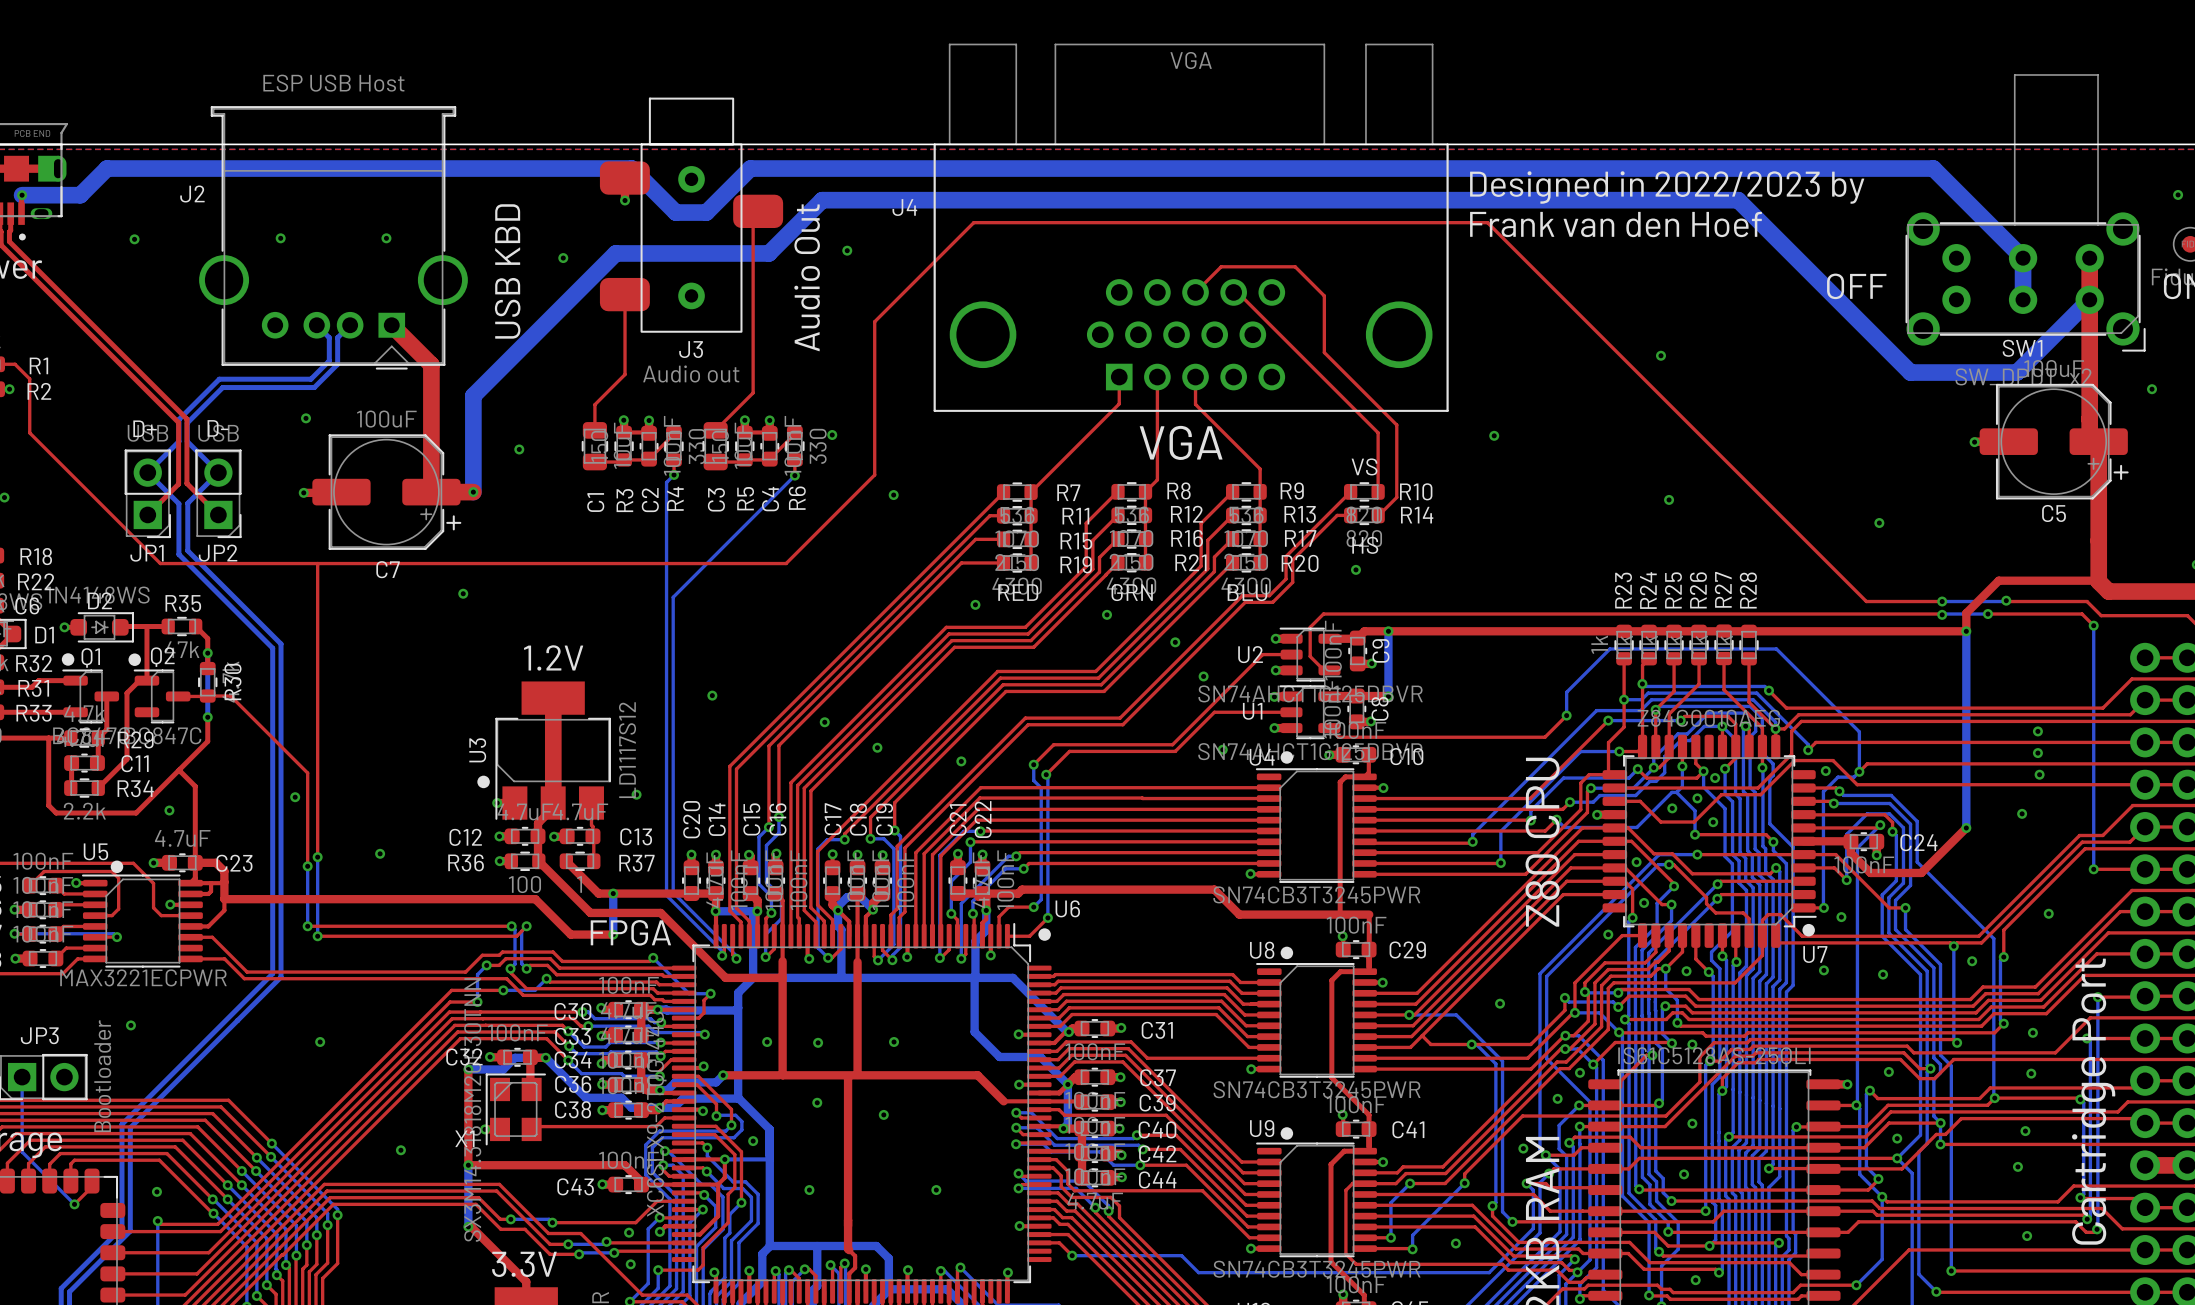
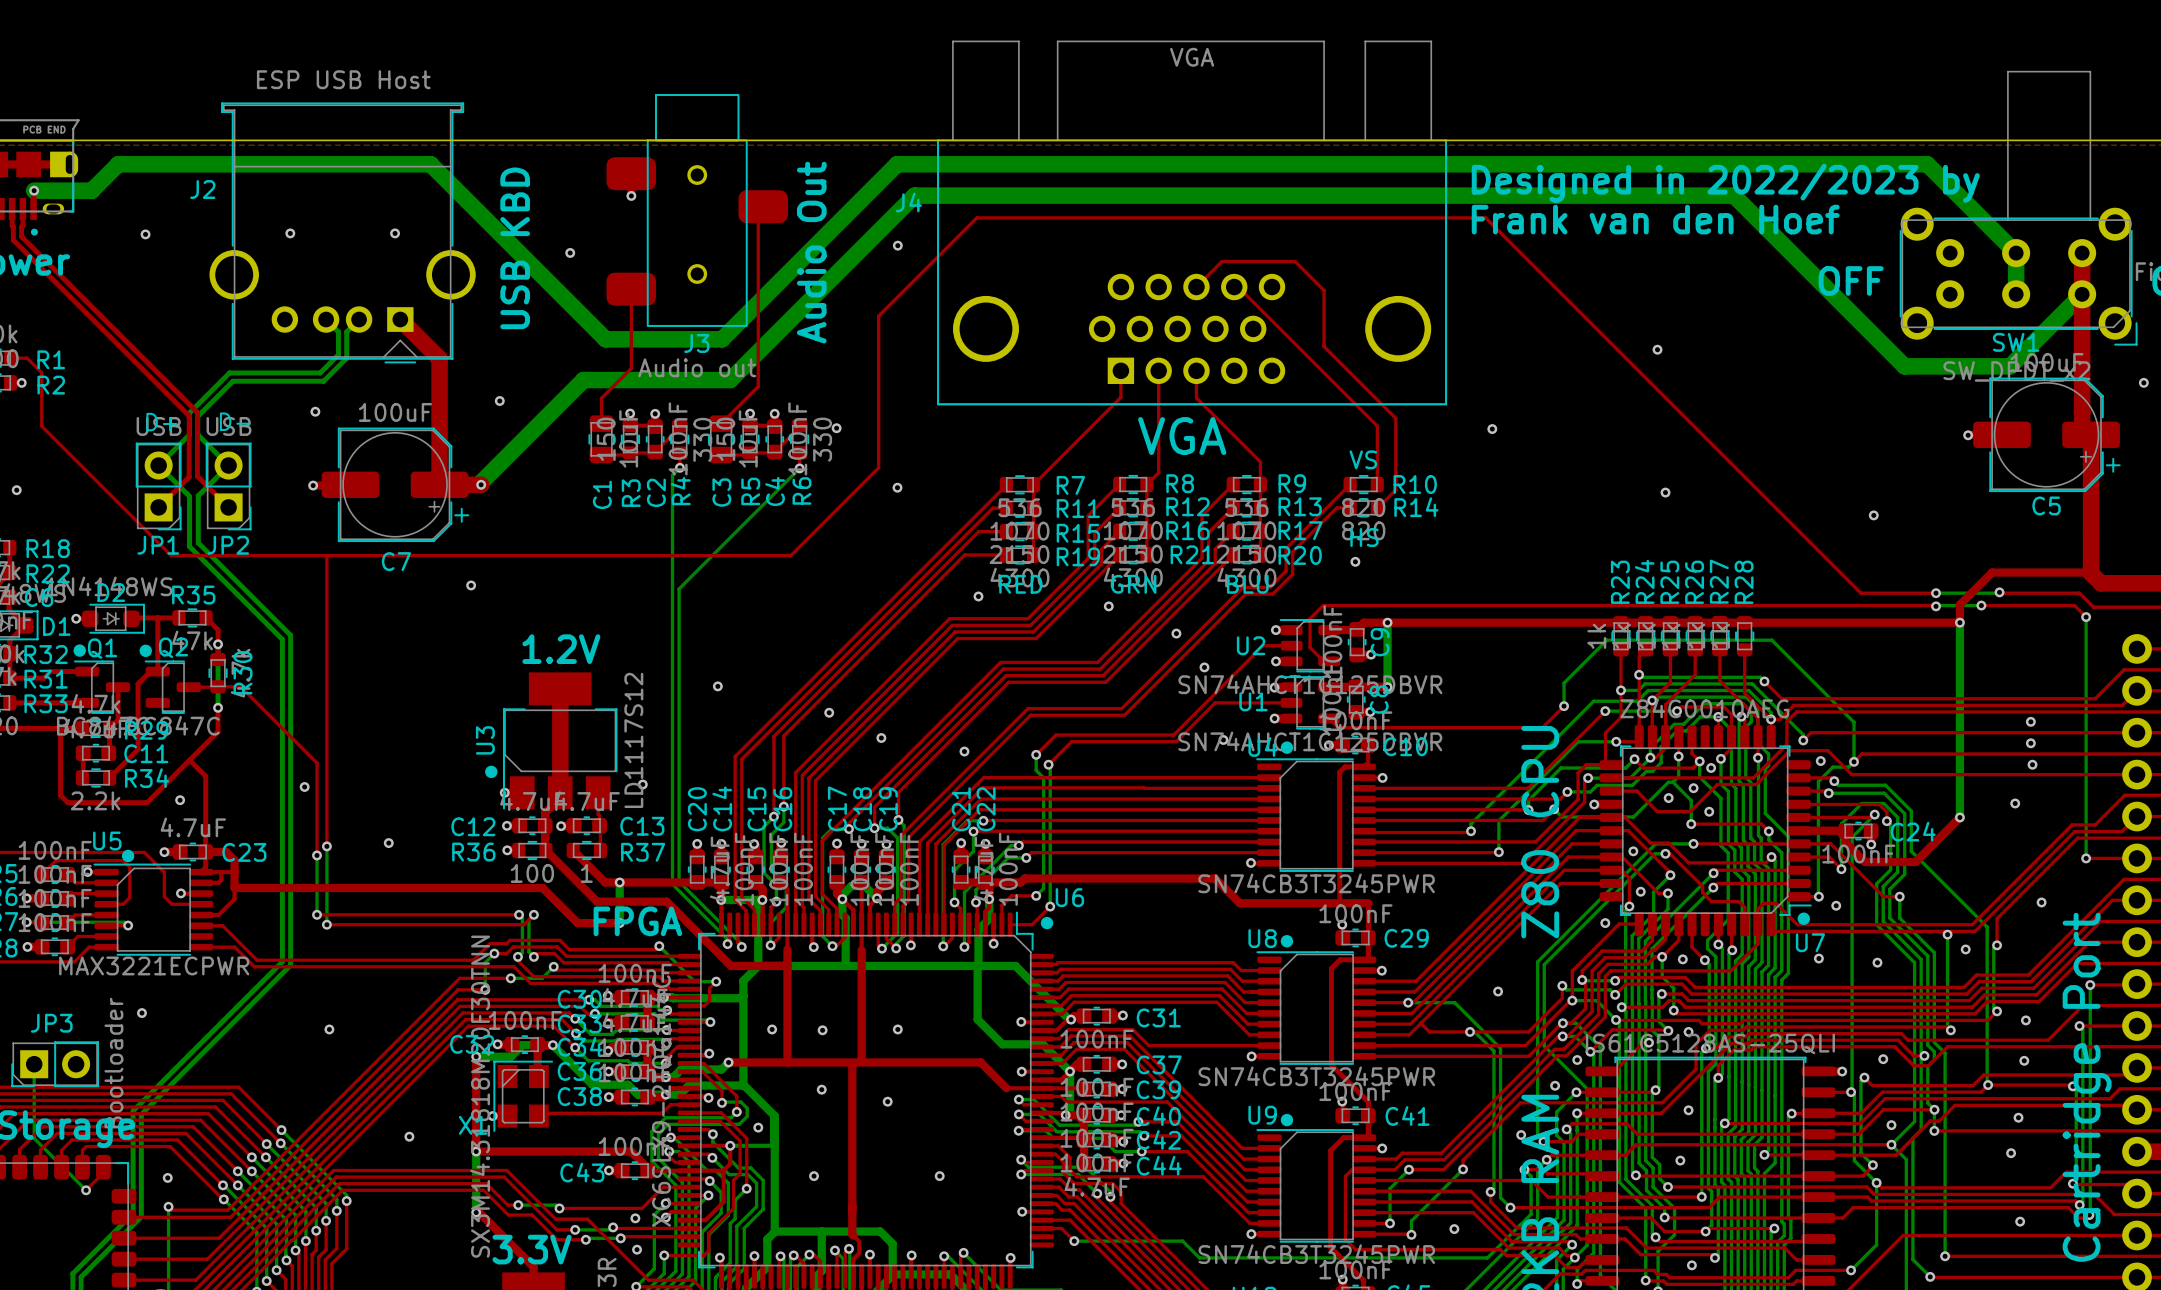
J3 footprint: [599, 97, 784, 333] -> [606, 94, 788, 327]
bottom track: (422, 168) (631, 168) (675, 212) (706, 212) (750, 168) (893, 168) -> (430, 164) (605, 339) (722, 339) (897, 164)
bottom track: (911, 200) (822, 200) (768, 253) (615, 253) (473, 395) (473, 489) -> (914, 195) (730, 380) (583, 380) (481, 482)
via position: (847, 250) -> (897, 245)
via position: (519, 449) -> (499, 401)

